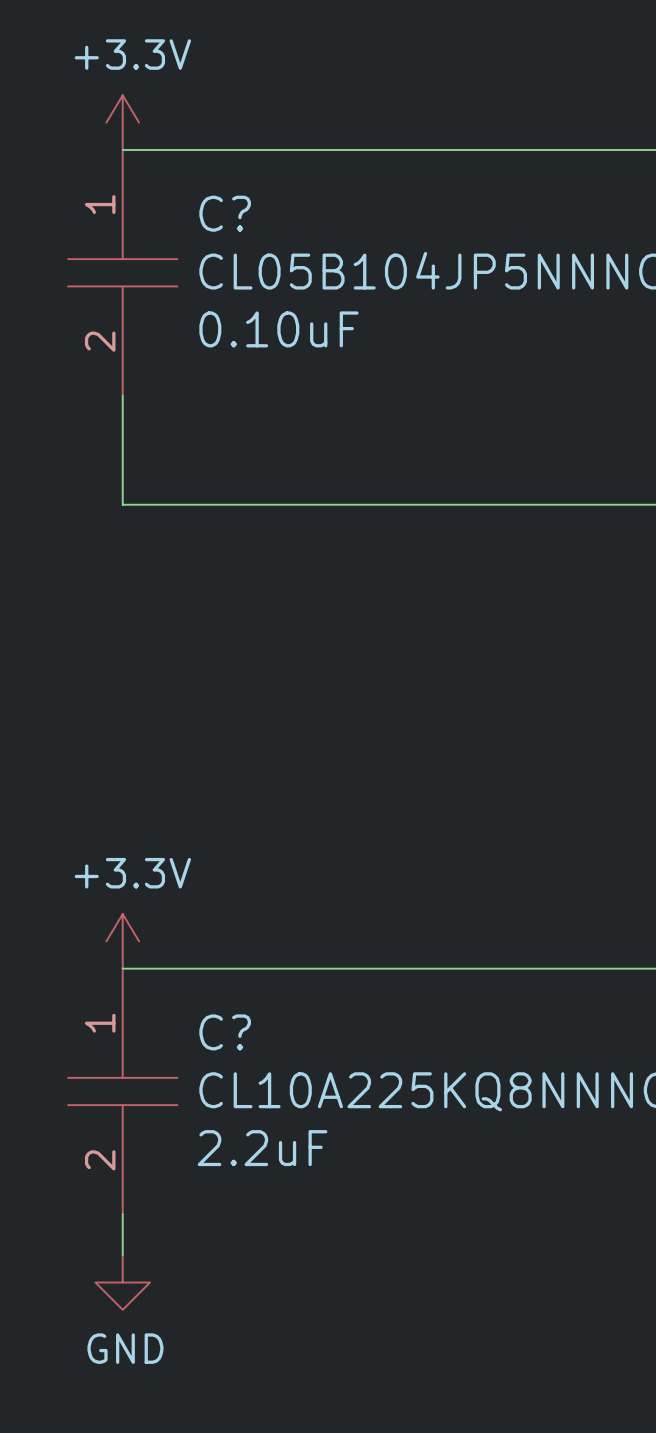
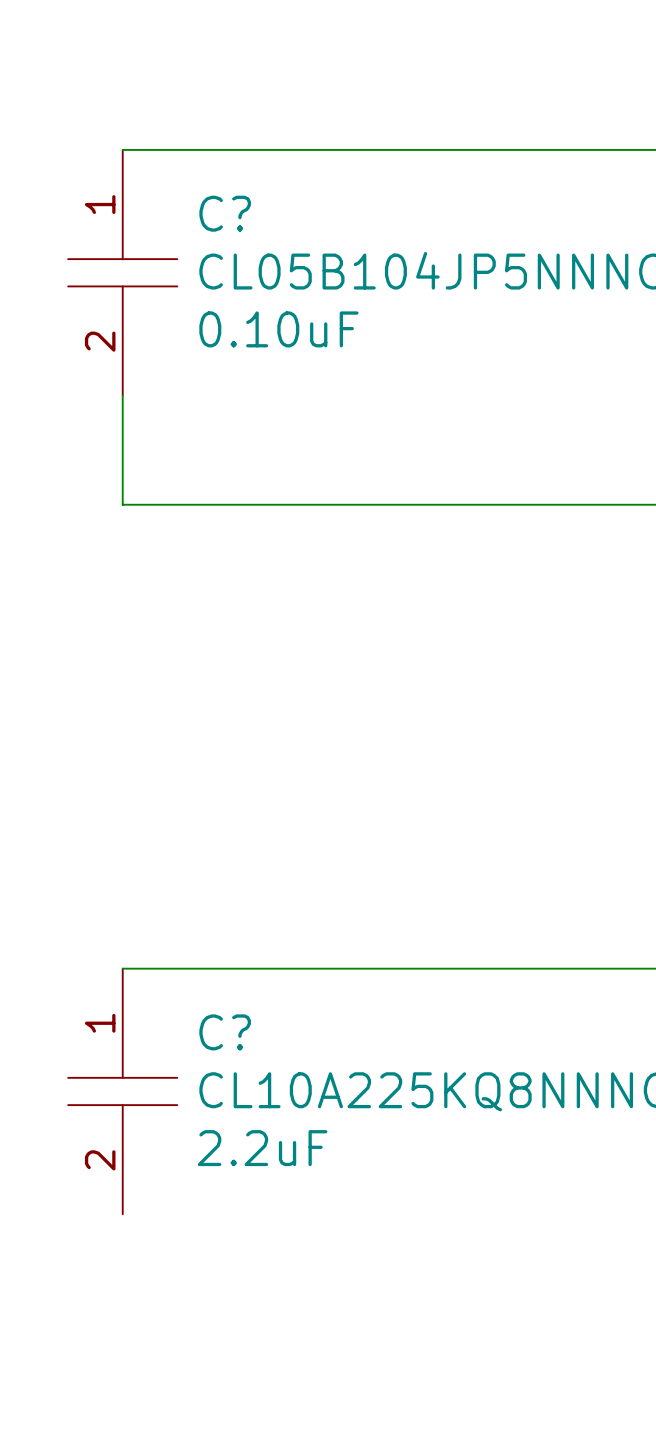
power symbol: +3.3V (122, 122) -> none
power symbol: +3.3V (122, 941) -> none
wire: (122, 1214) (122, 1255) -> none
power symbol: GND (122, 1282) -> none

